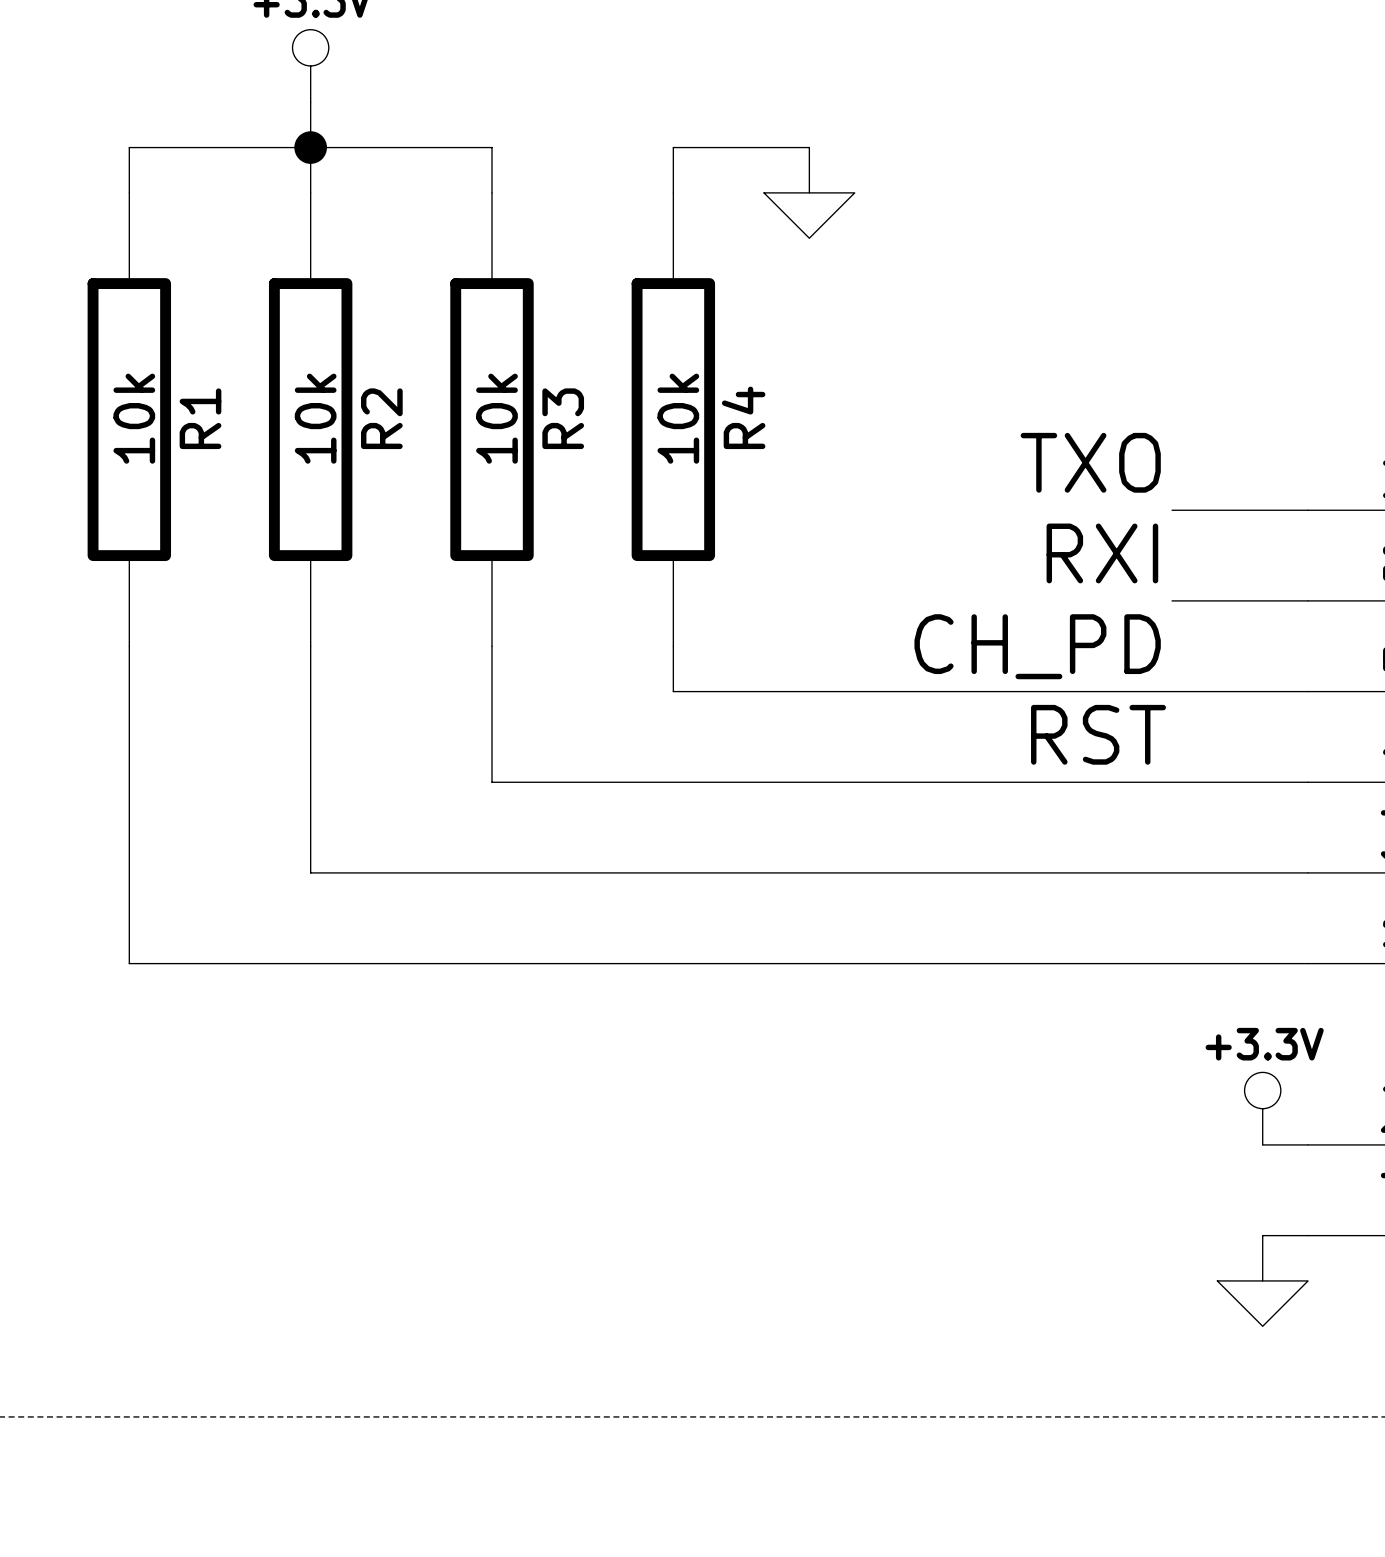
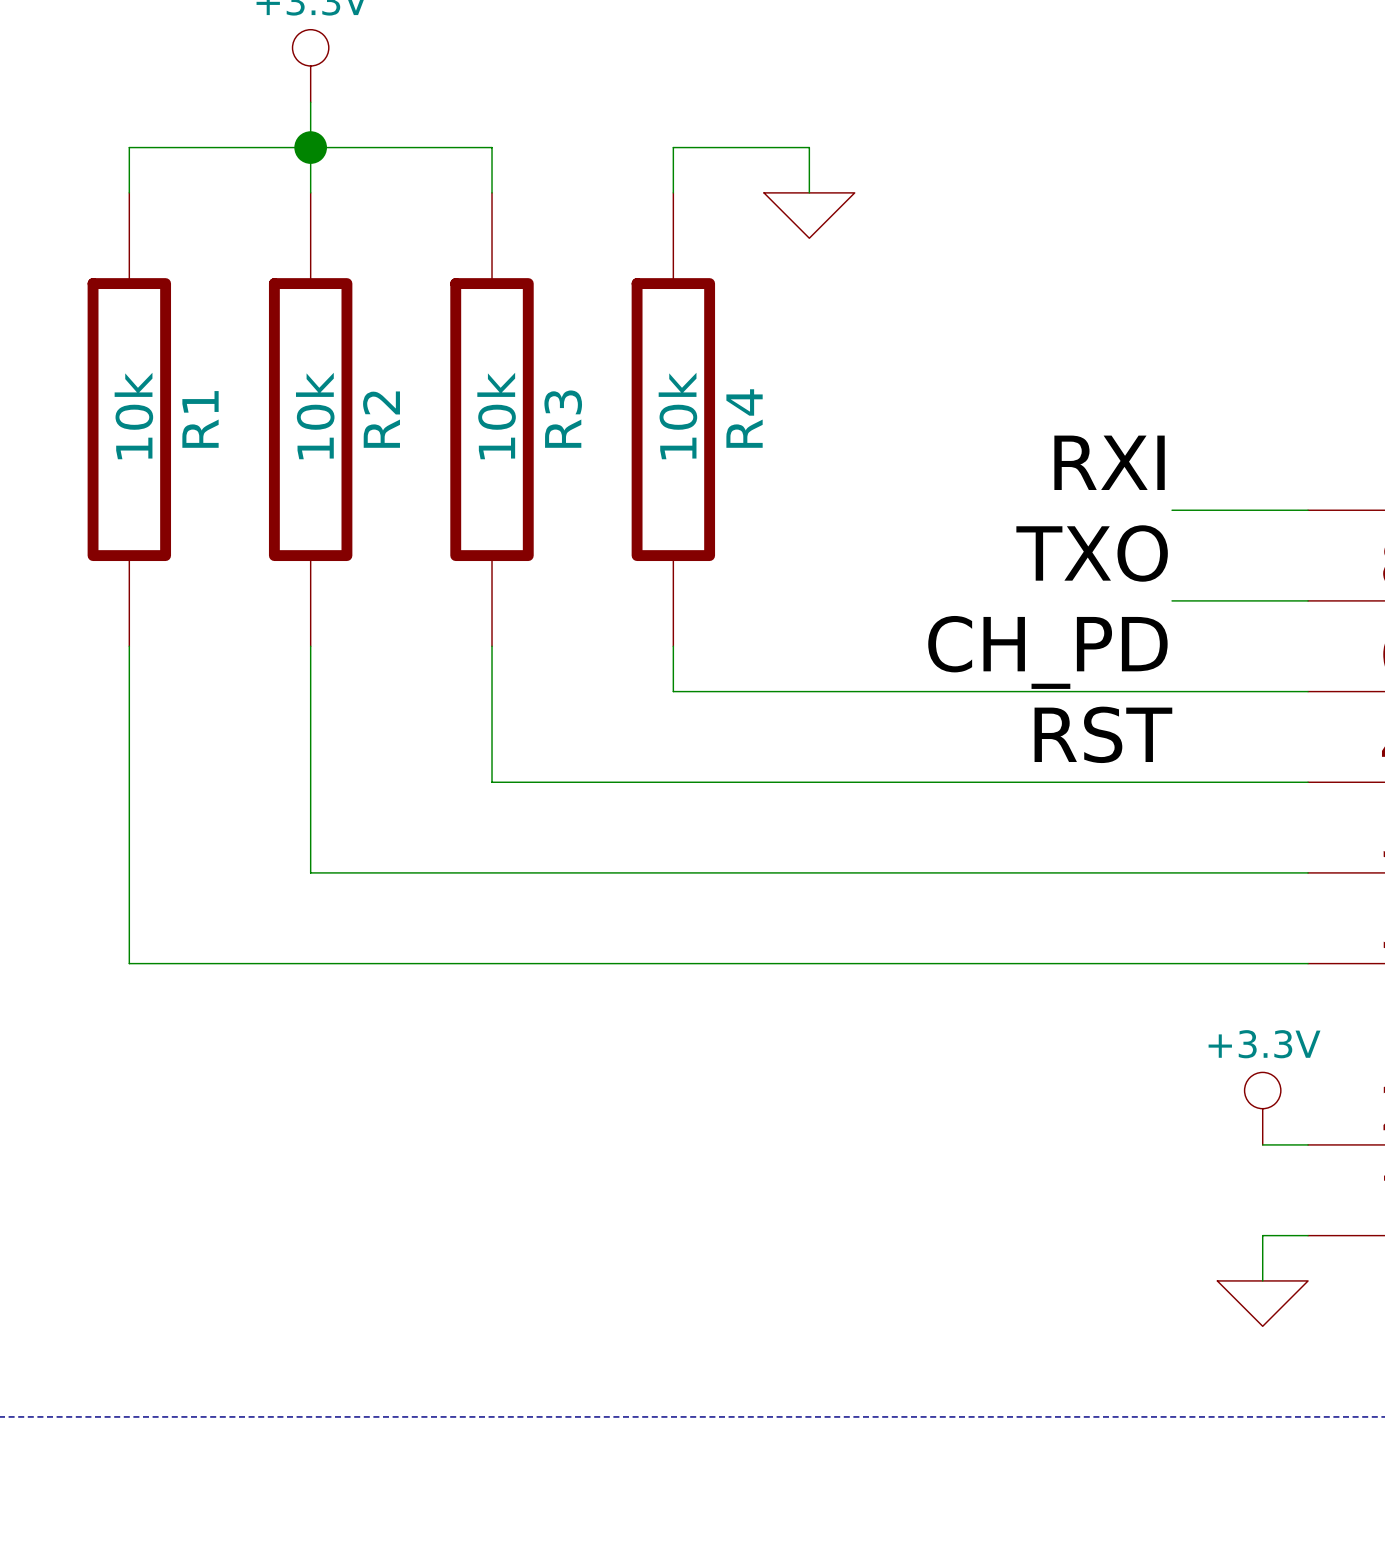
label: TXO (1090, 462) -> RXI (1109, 462)
label: RXI (1102, 553) -> TXO (1092, 553)

